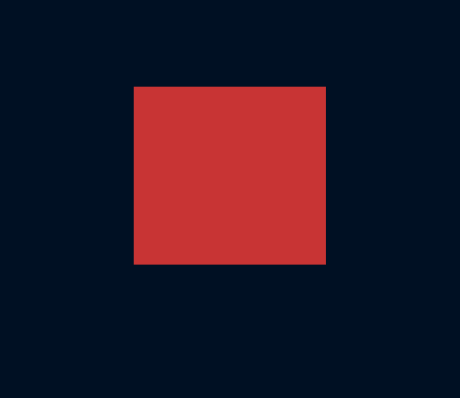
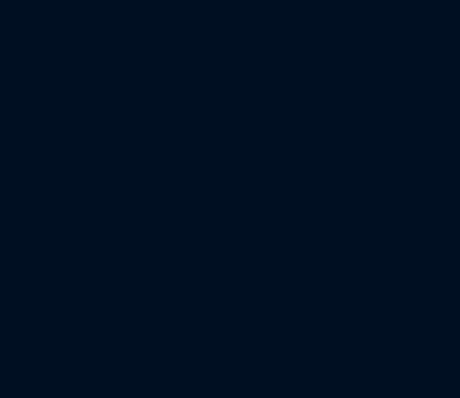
part: (229, 175) -> none

